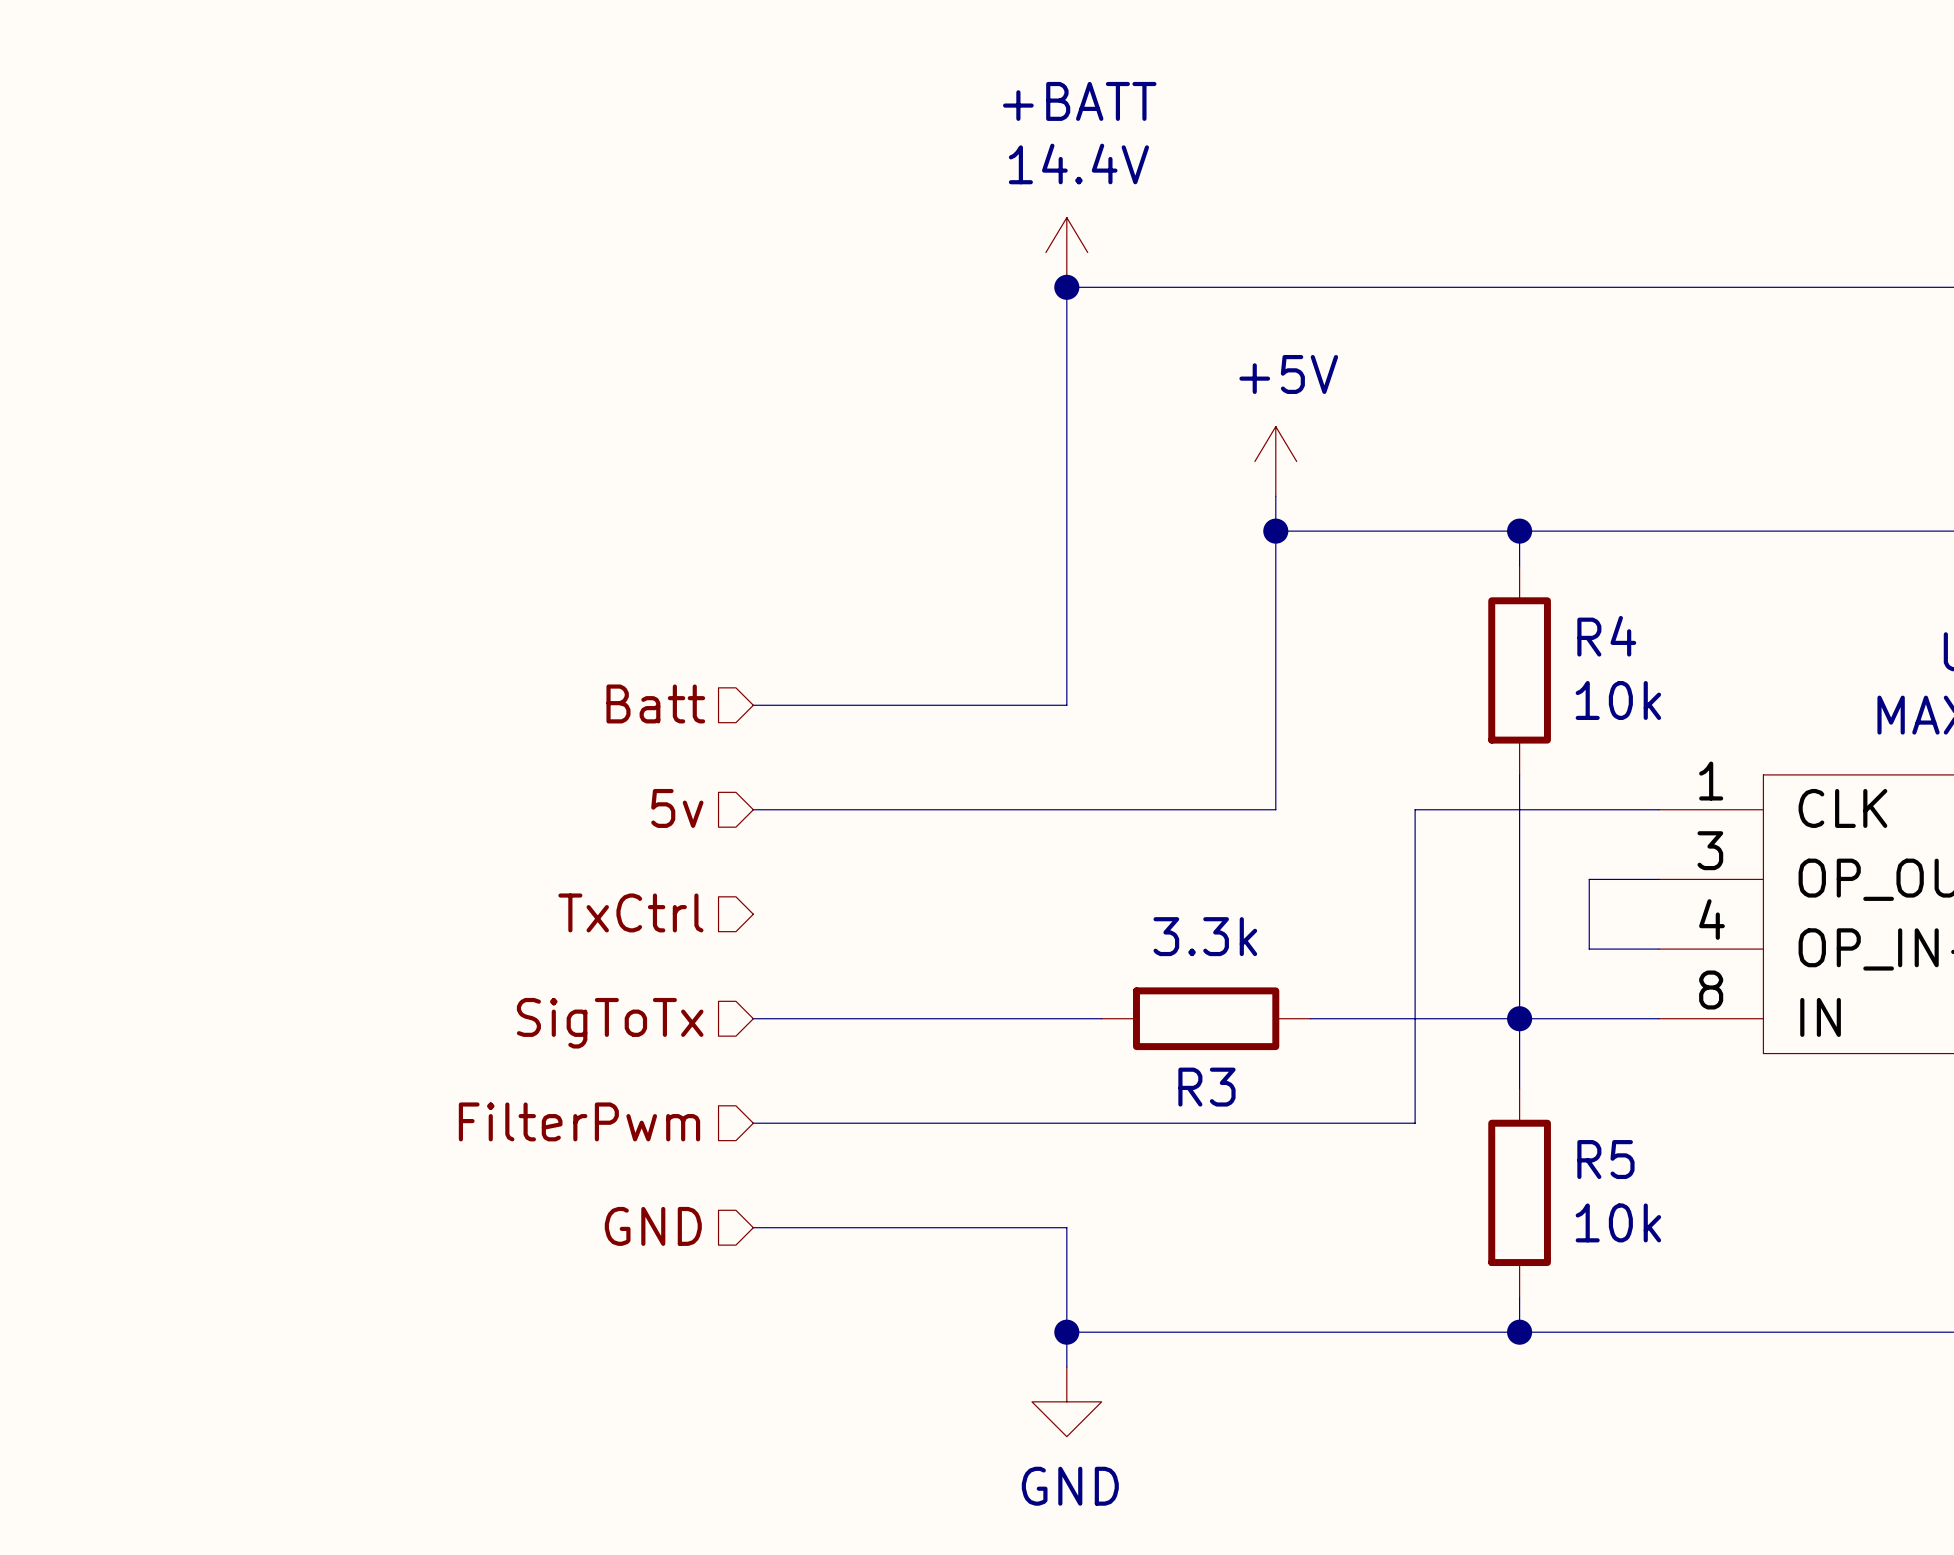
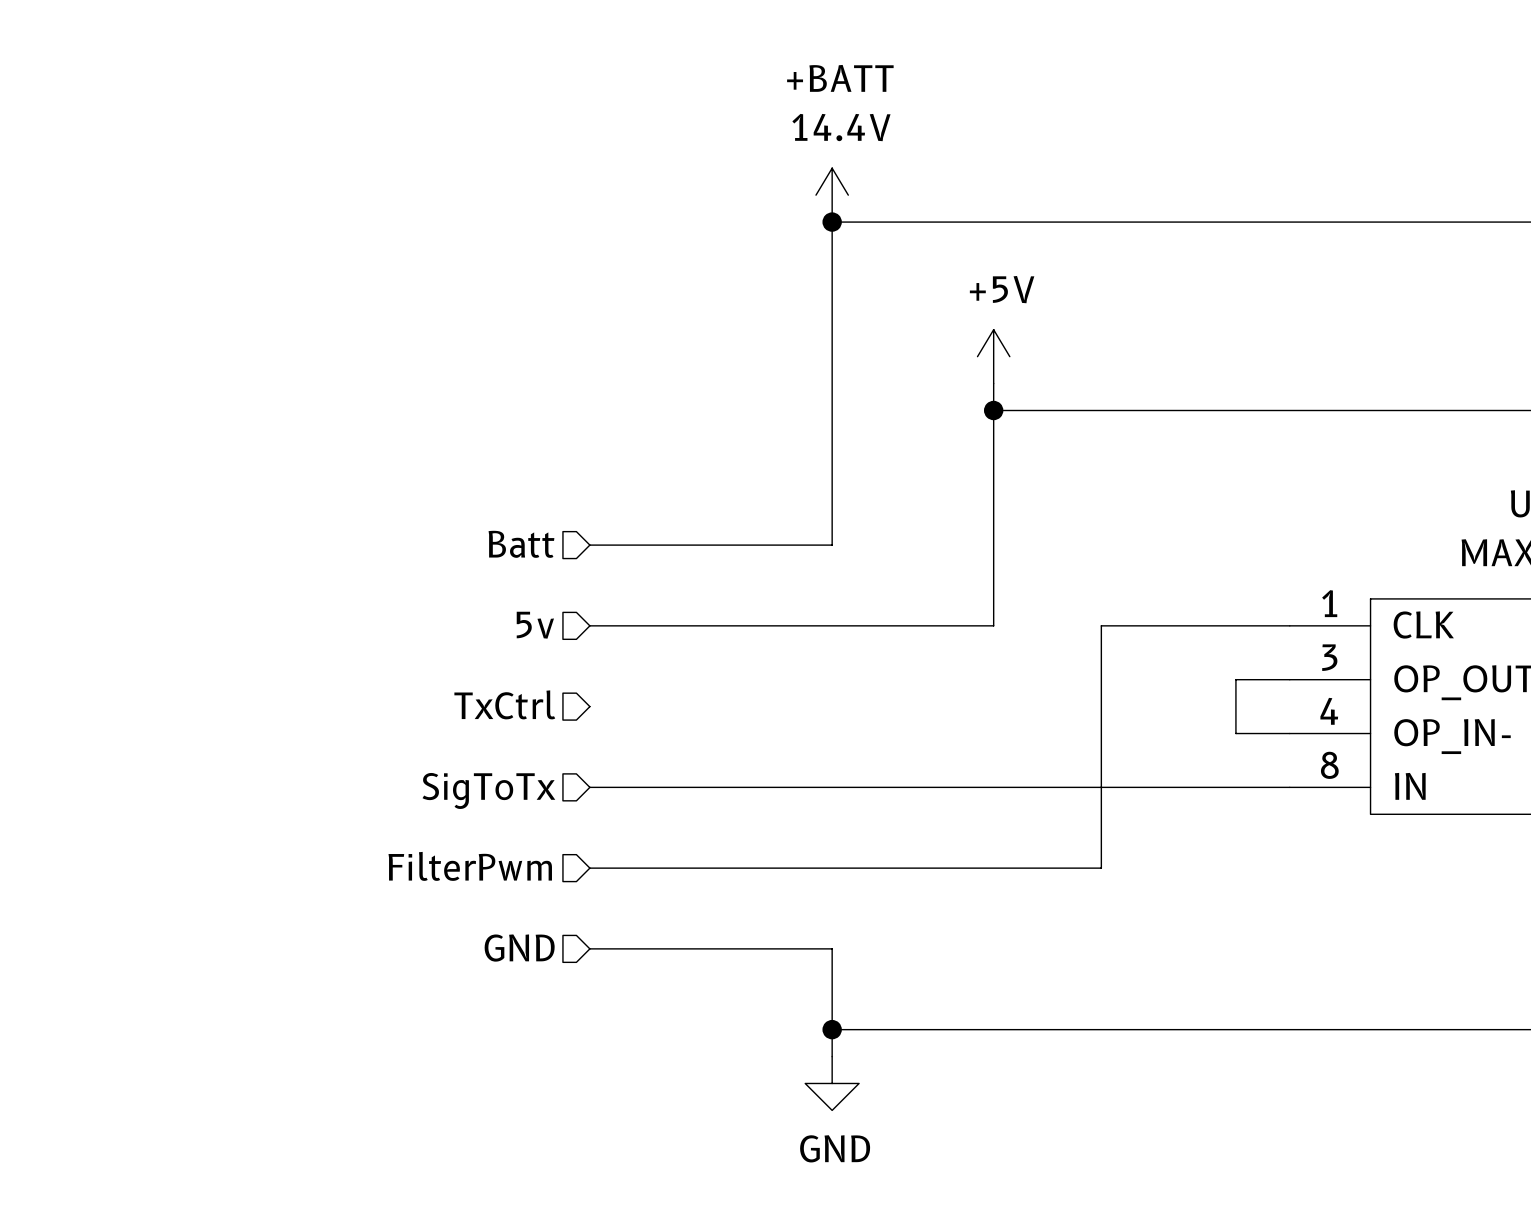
wire: (1519, 531) (1519, 565) -> none
junction: (1519, 531) -> none
R4: 10k (1519, 670) -> none
wire: (1519, 774) (1519, 1088) -> none
wire: none -> (859, 787) (1020, 787)
R3: 3.3k (1206, 1018) -> none
junction: (1519, 1018) -> none
R5: 10k (1519, 1192) -> none
wire: (1519, 1297) (1519, 1332) -> none
junction: (1519, 1332) -> none

